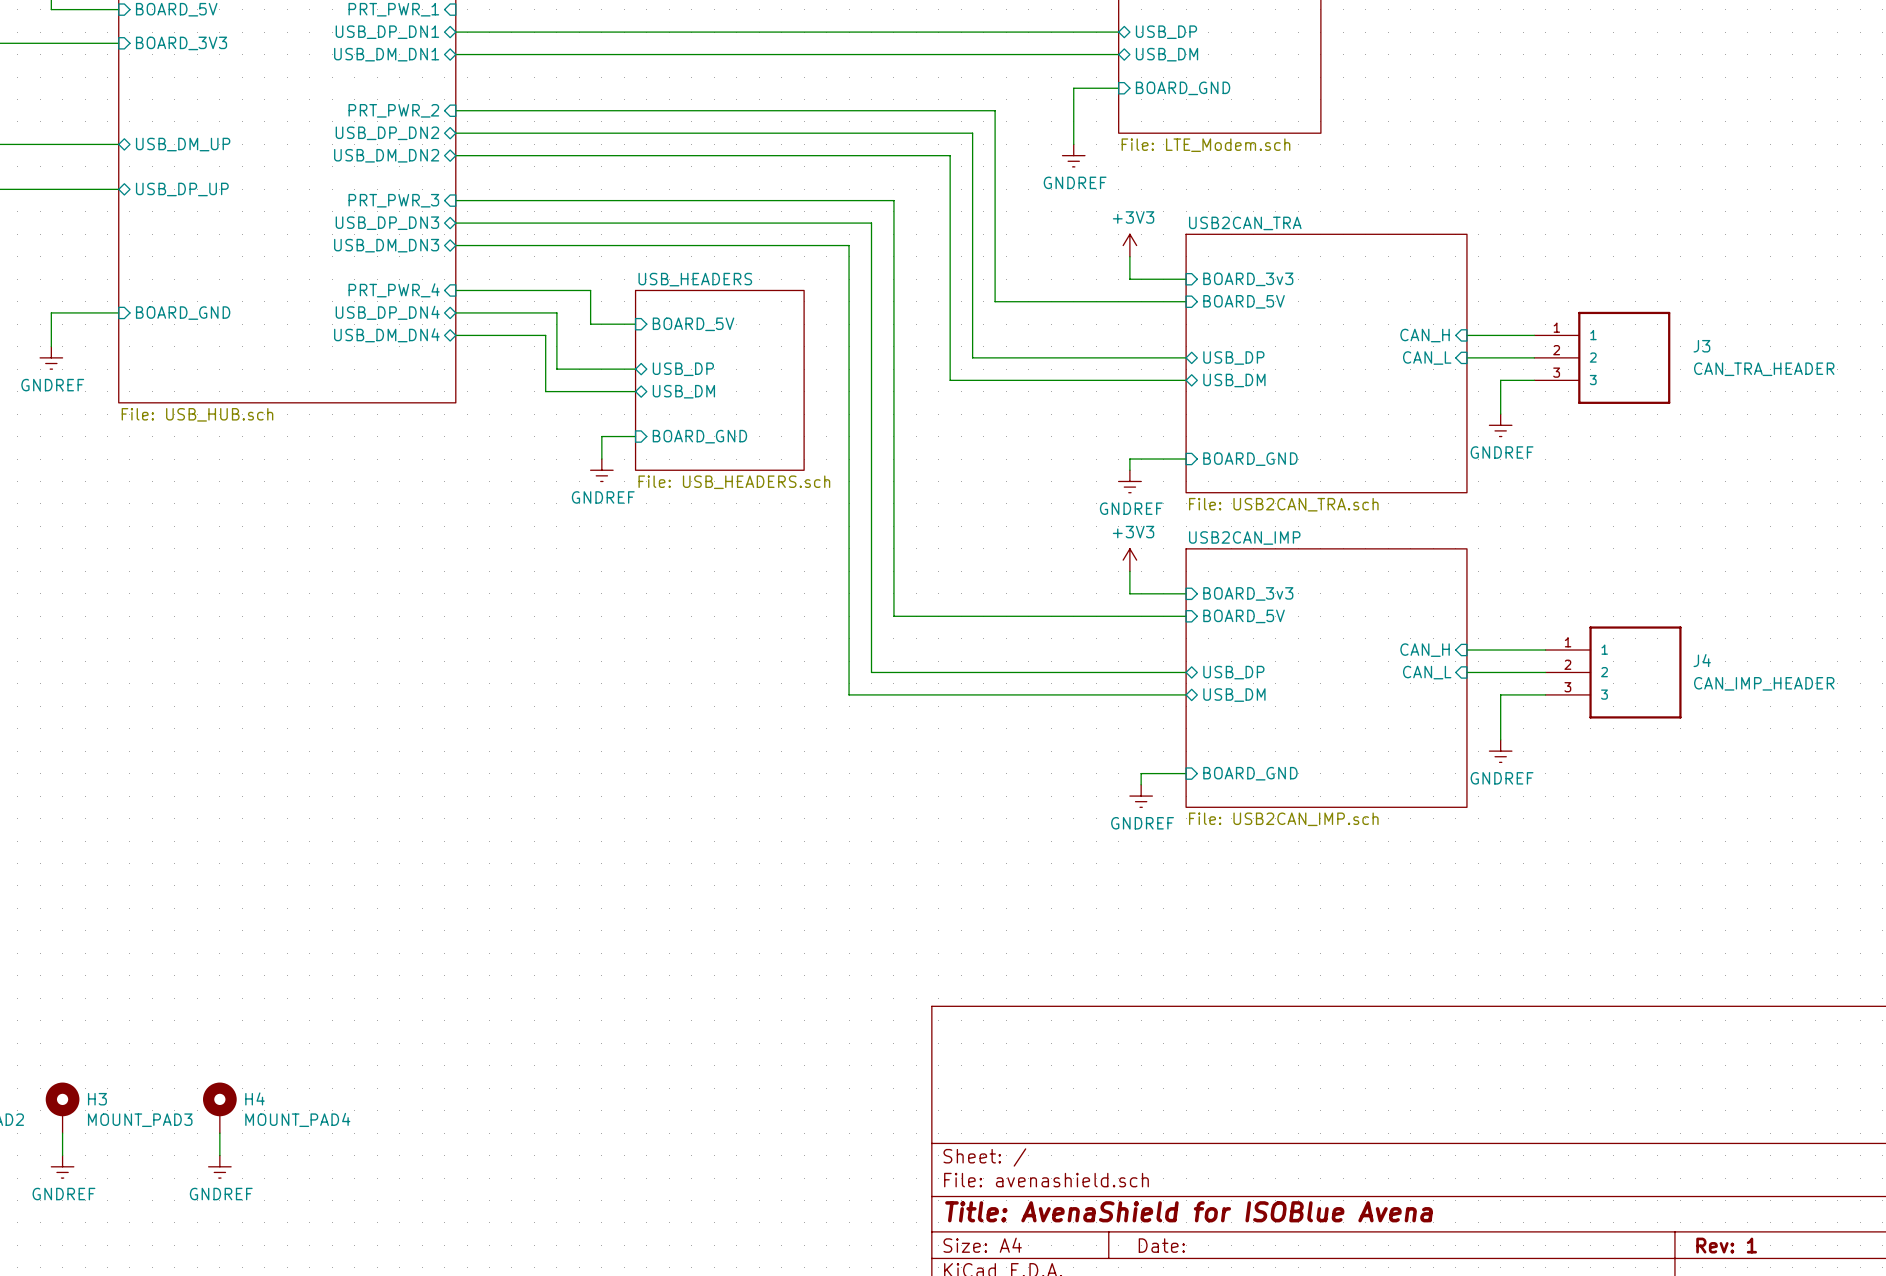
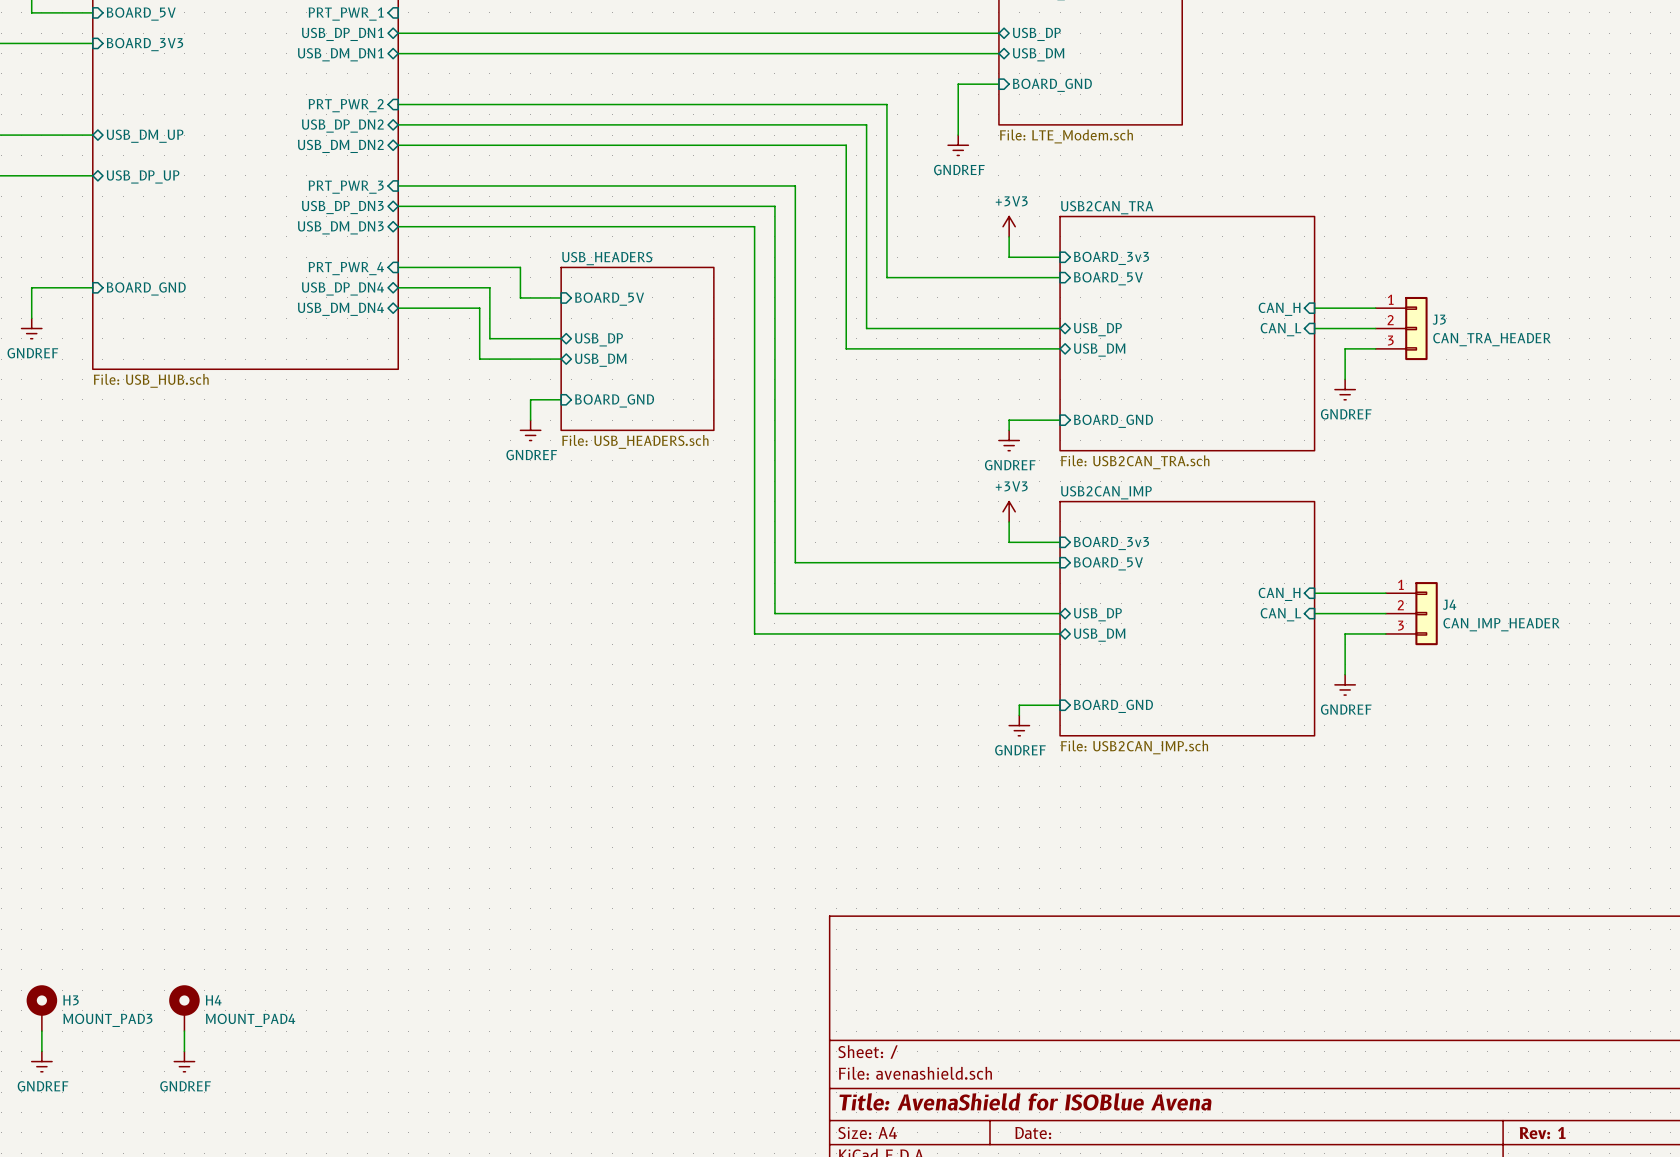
J3 symbol: [1534, 311, 1671, 404] -> [1375, 296, 1428, 361]
J3 name position: J3 (1701, 346) -> J3 (1439, 319)
J3 value position: CAN_TRA_HEADER (1764, 369) -> CAN_TRA_HEADER (1492, 339)
J4 symbol: [1545, 626, 1682, 719] -> [1385, 582, 1438, 646]
J4 name position: J4 (1702, 660) -> J4 (1449, 604)
J4 value position: CAN_IMP_HEADER (1764, 683) -> CAN_IMP_HEADER (1501, 624)

